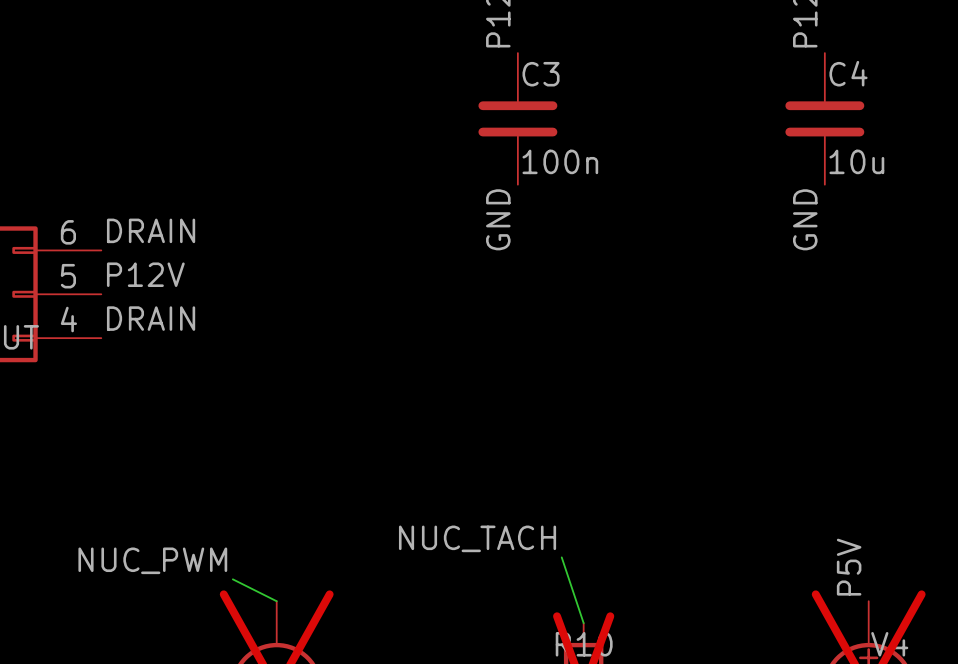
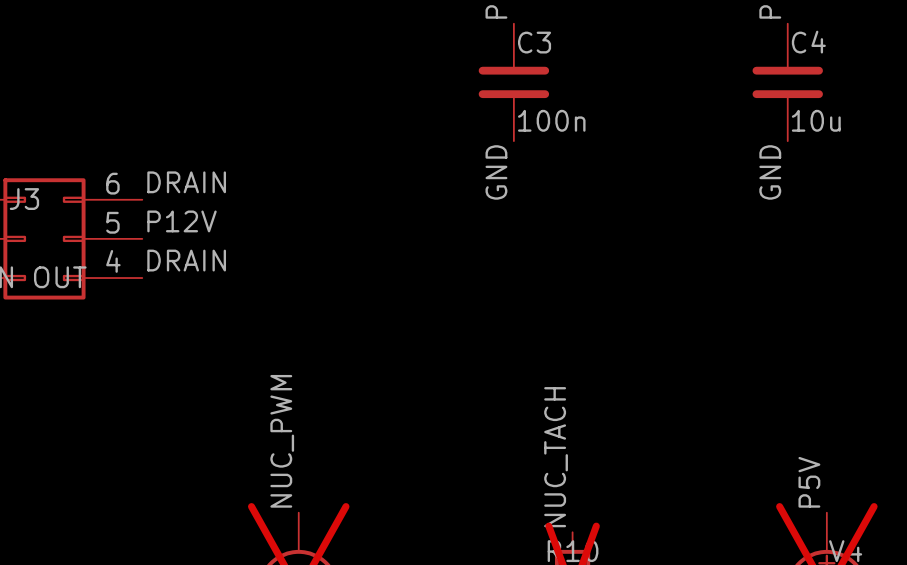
label rotation: 0° (477, 538) -> 90° counterclockwise (556, 457)
wire: (561, 557) (583, 623) -> none
label rotation: 0° (152, 560) -> 90° counterclockwise (282, 441)
wire: (232, 579) (276, 601) -> none

